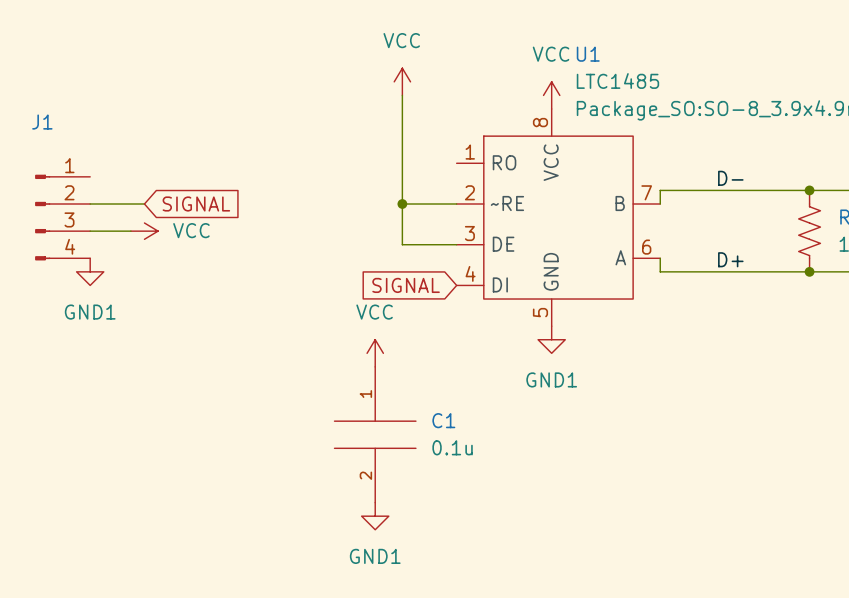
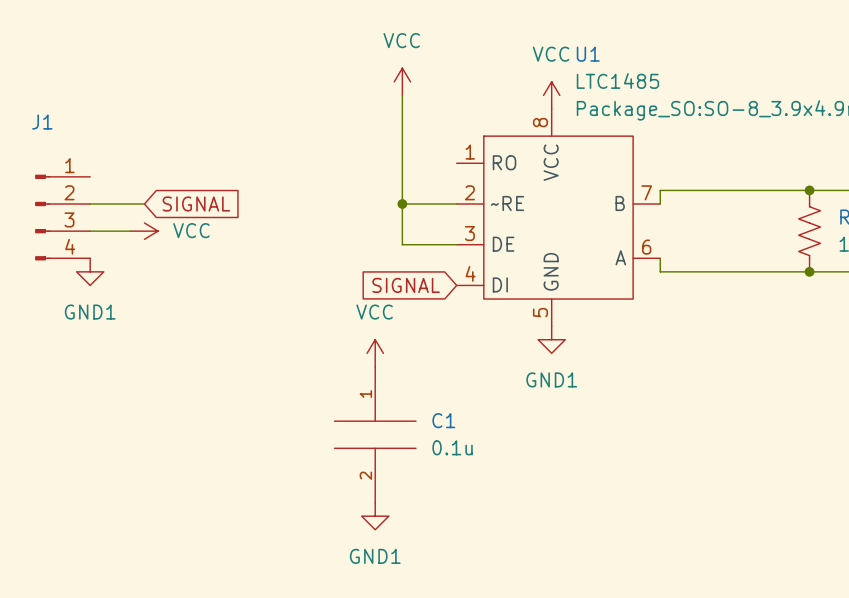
label: D- (730, 178) -> none
label: D+ (730, 259) -> none

